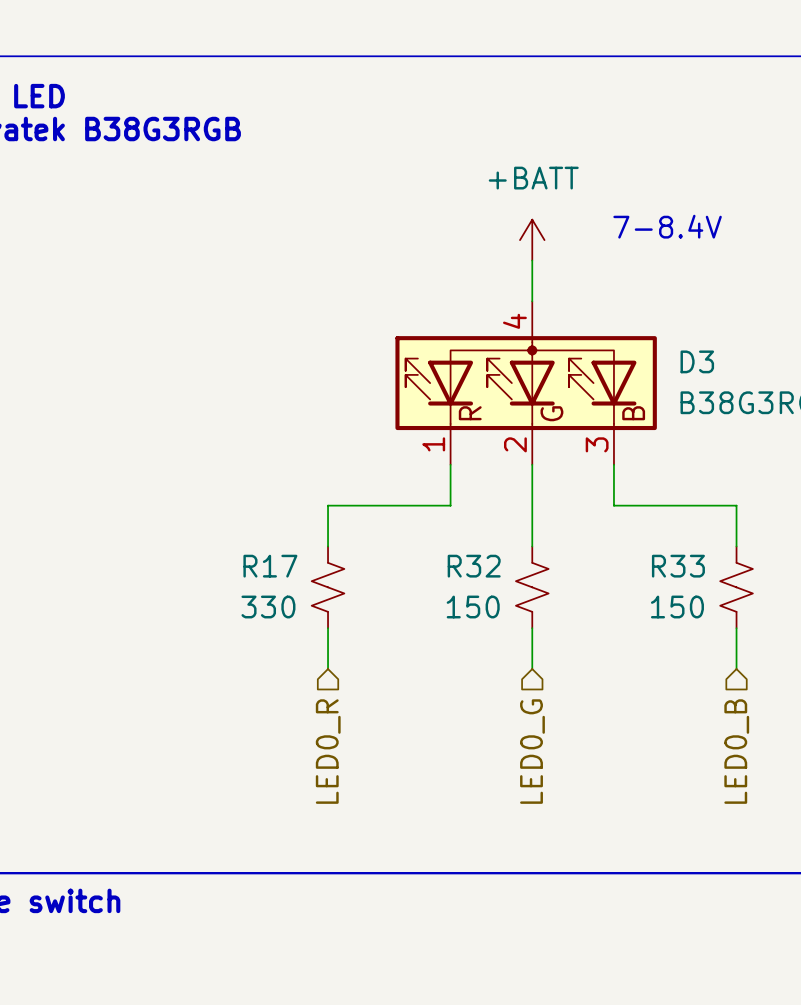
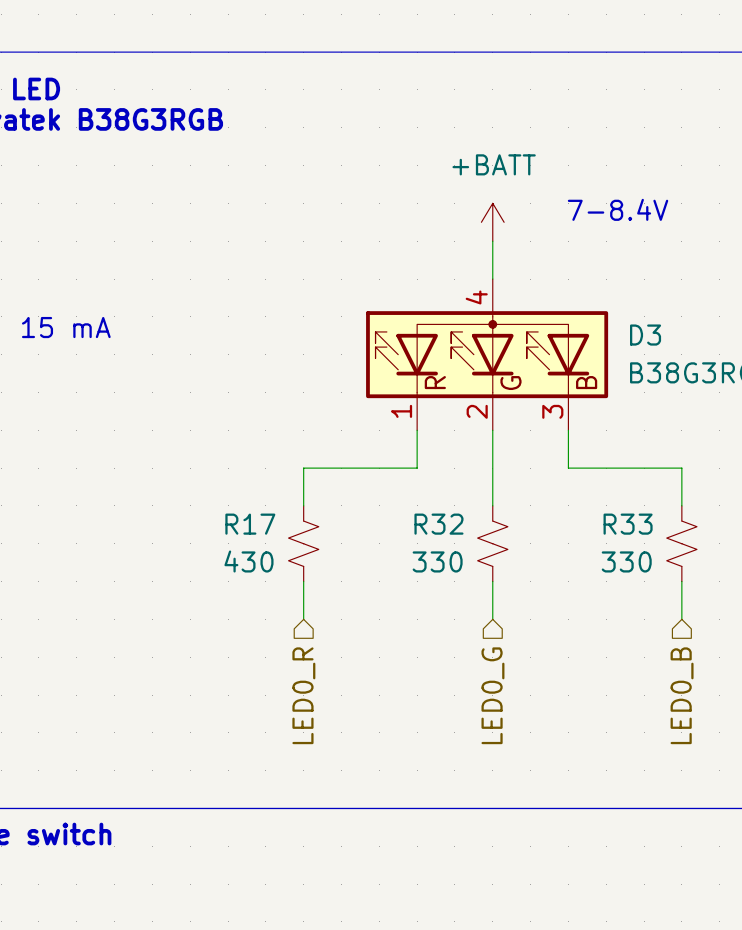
text: none -> 15 mA (66, 327)
R17 value: 330 (268, 607) -> 430 (248, 561)
R32 value: 150 (473, 607) -> 330 (437, 561)
R33 value: 150 (677, 607) -> 330 (626, 561)

